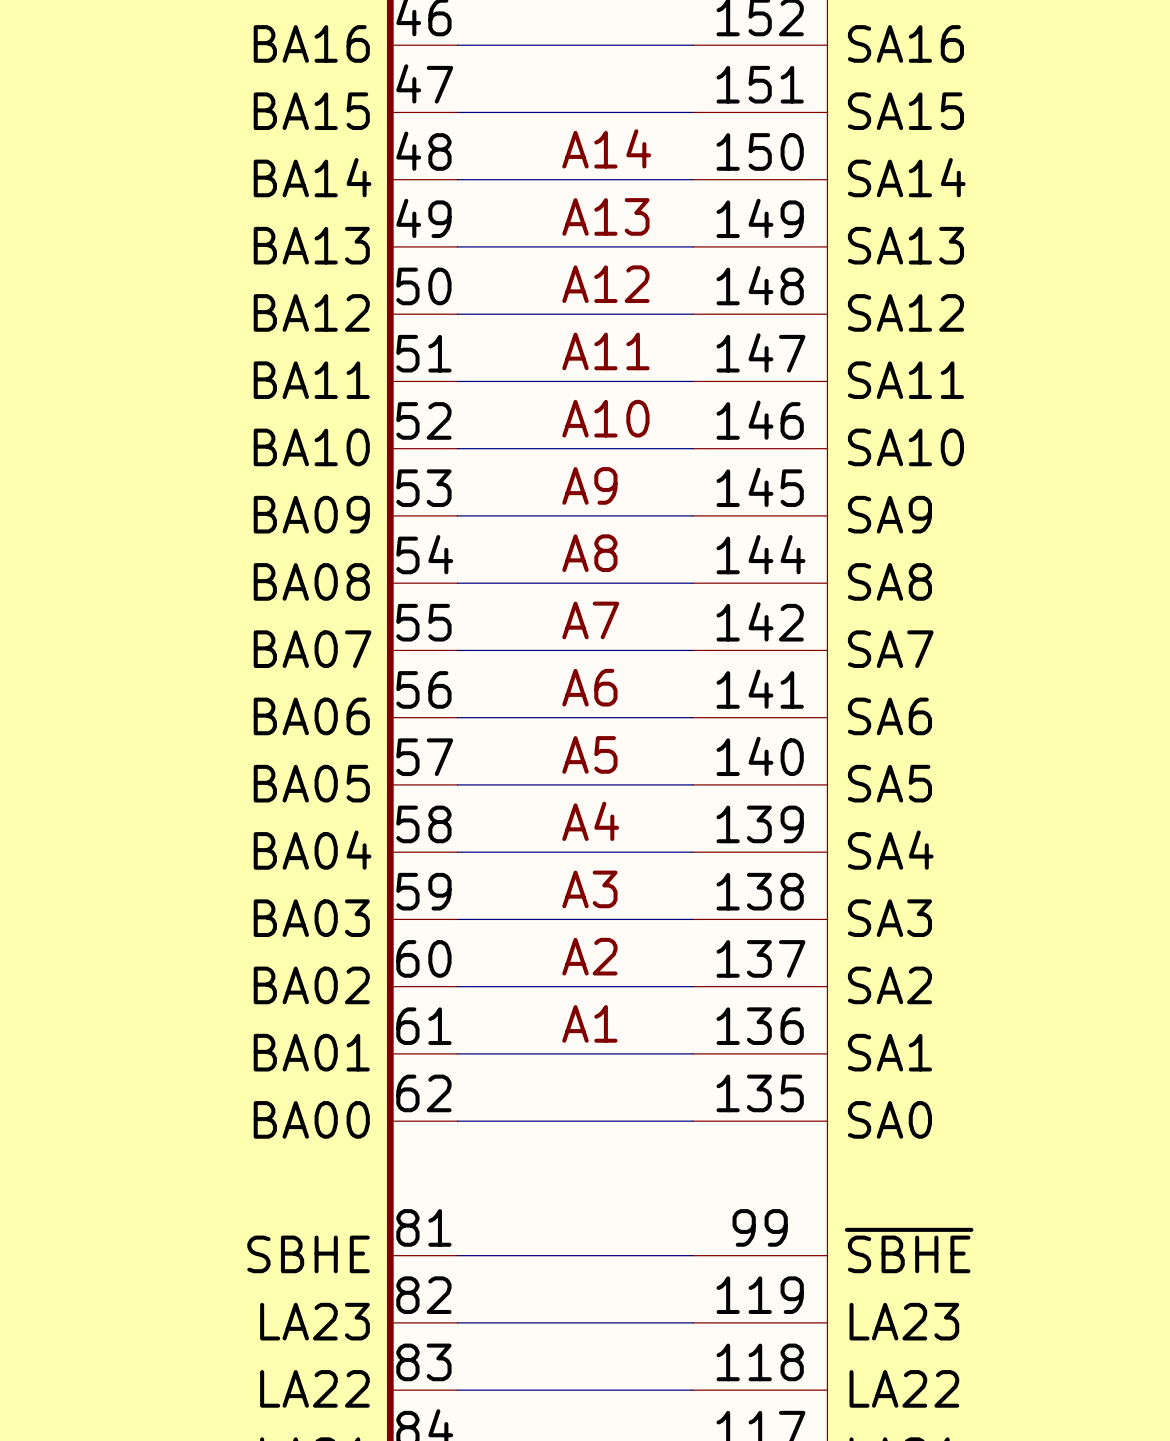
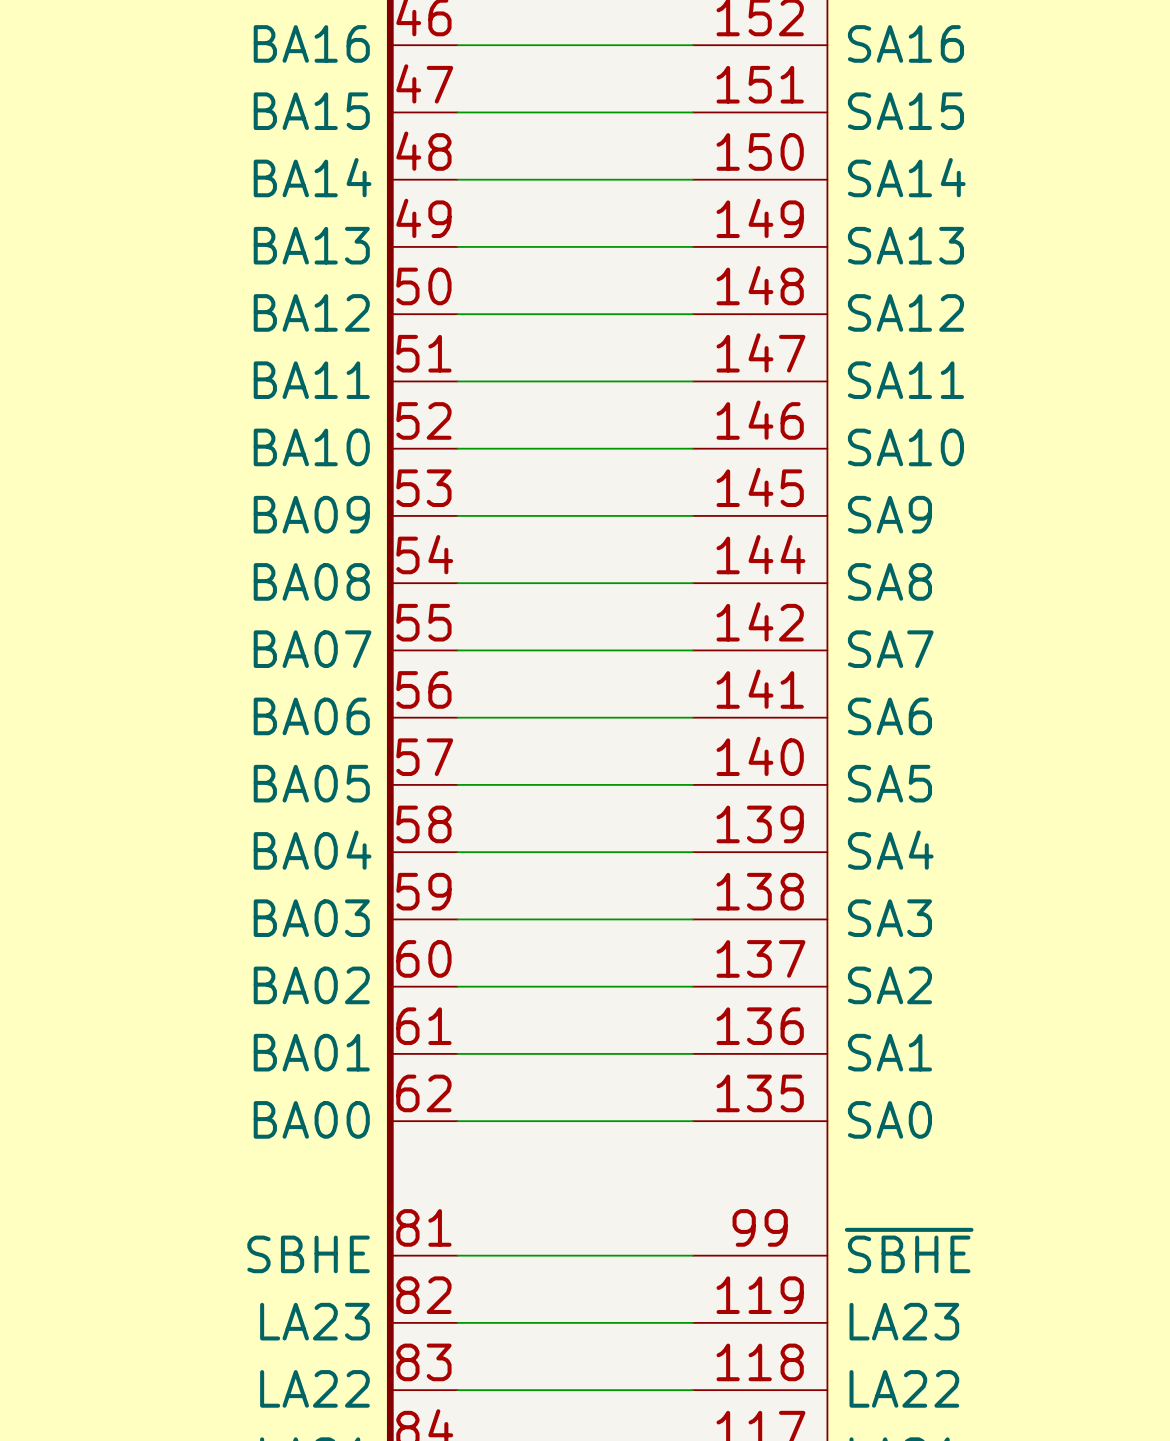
label: A14 (606, 148) -> none
label: A13 (605, 216) -> none
label: A12 (605, 284) -> none
label: A11 (605, 351) -> none
label: A10 (605, 418) -> none
label: A9 (589, 485) -> none
label: A8 (589, 553) -> none
label: A7 (590, 620) -> none
label: A6 (589, 687) -> none
label: A5 (589, 754) -> none
label: A4 (590, 821) -> none
label: A3 (589, 889) -> none
label: A2 (589, 956) -> none
label: A1 (589, 1023) -> none

